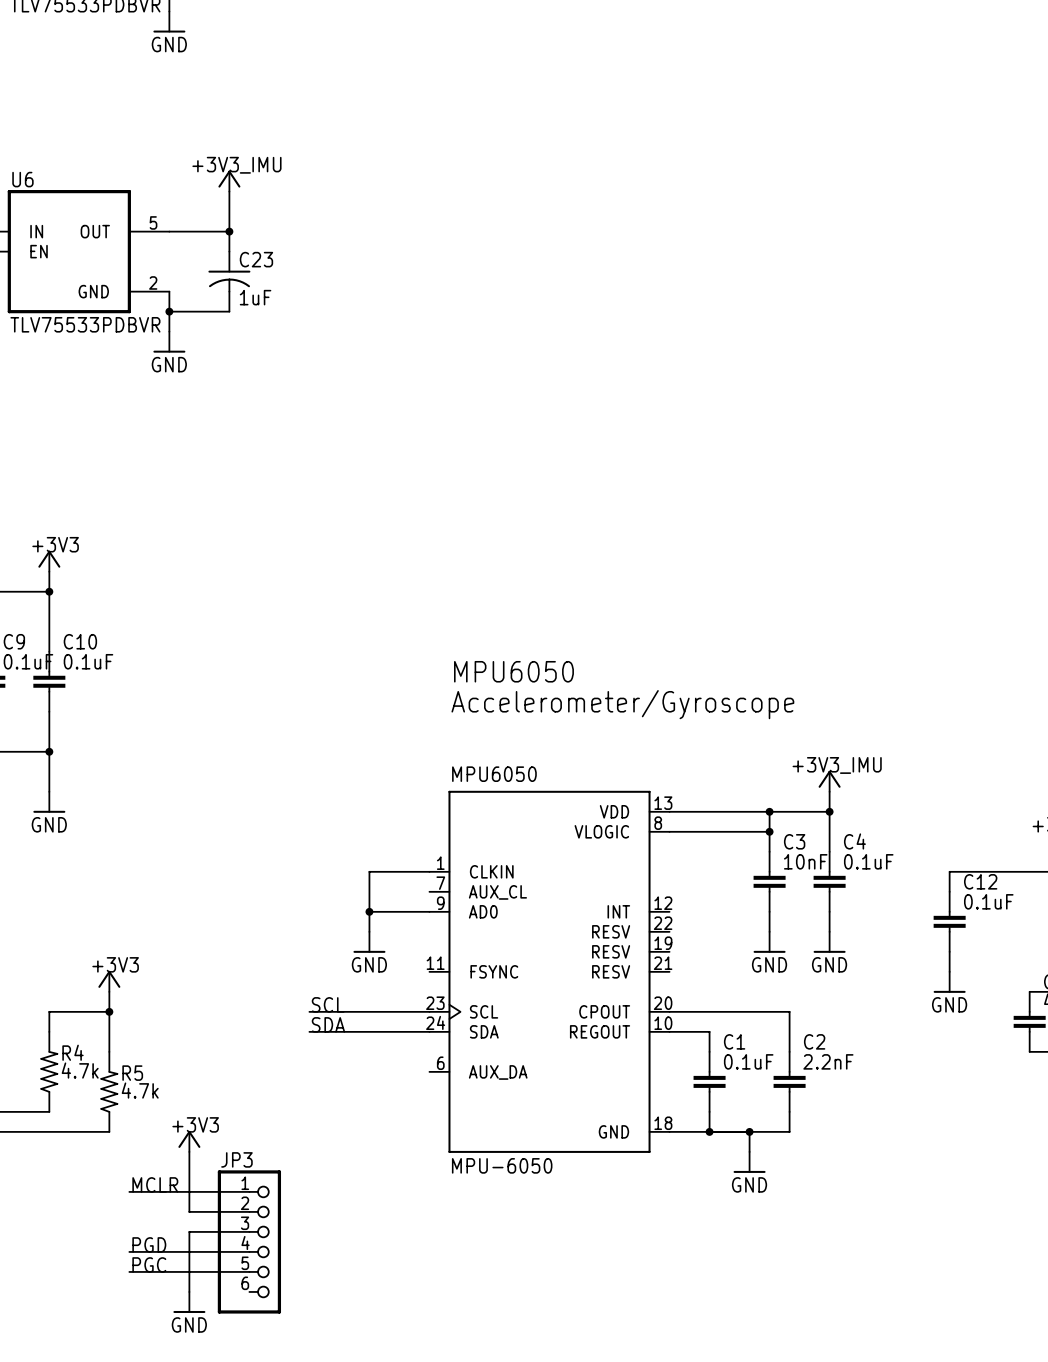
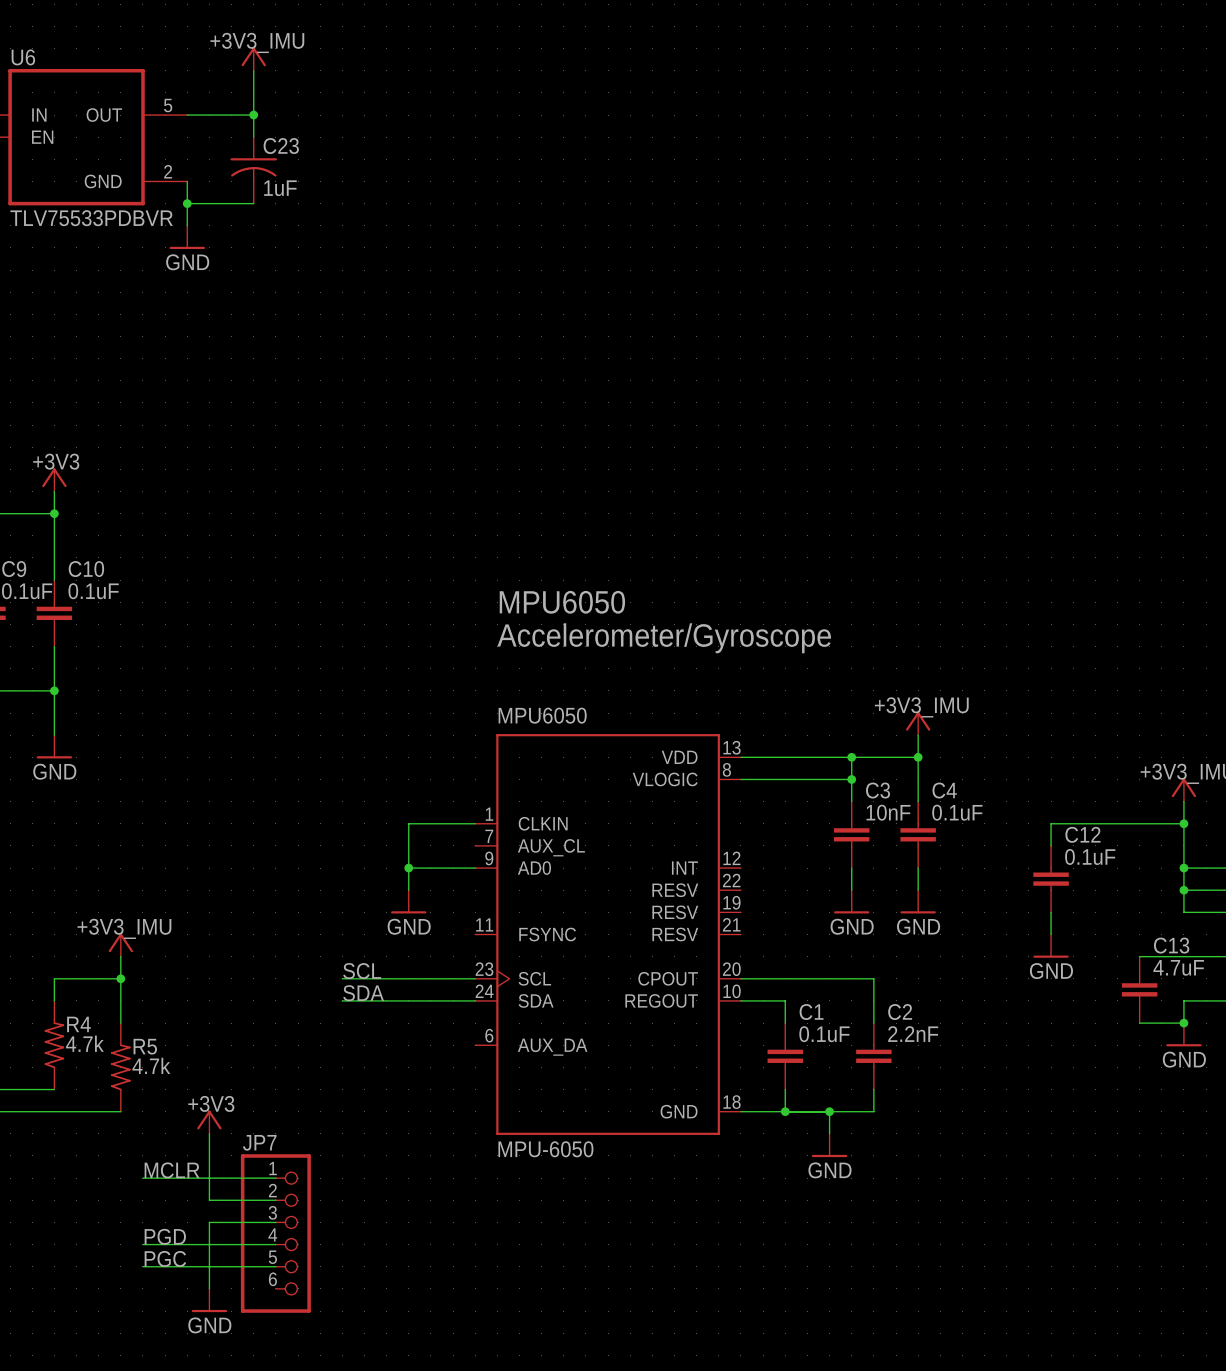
power symbol: +3V3 (109, 981) -> +3V3_IMU (120, 945)
JP3 name: JP3 (236, 1159) -> JP7 (259, 1142)

